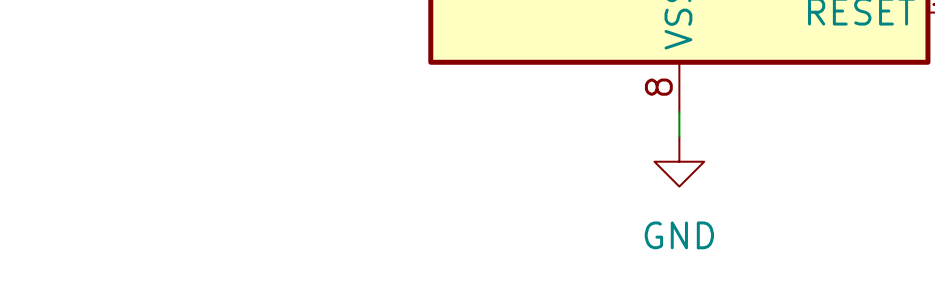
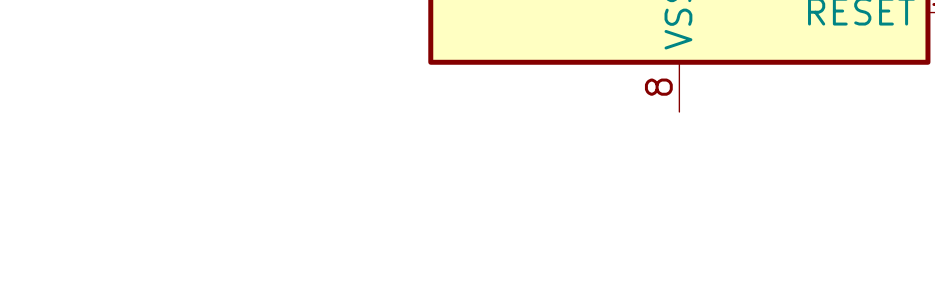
wire: (679, 112) (679, 136) -> none
power symbol: GND (679, 161) -> none

